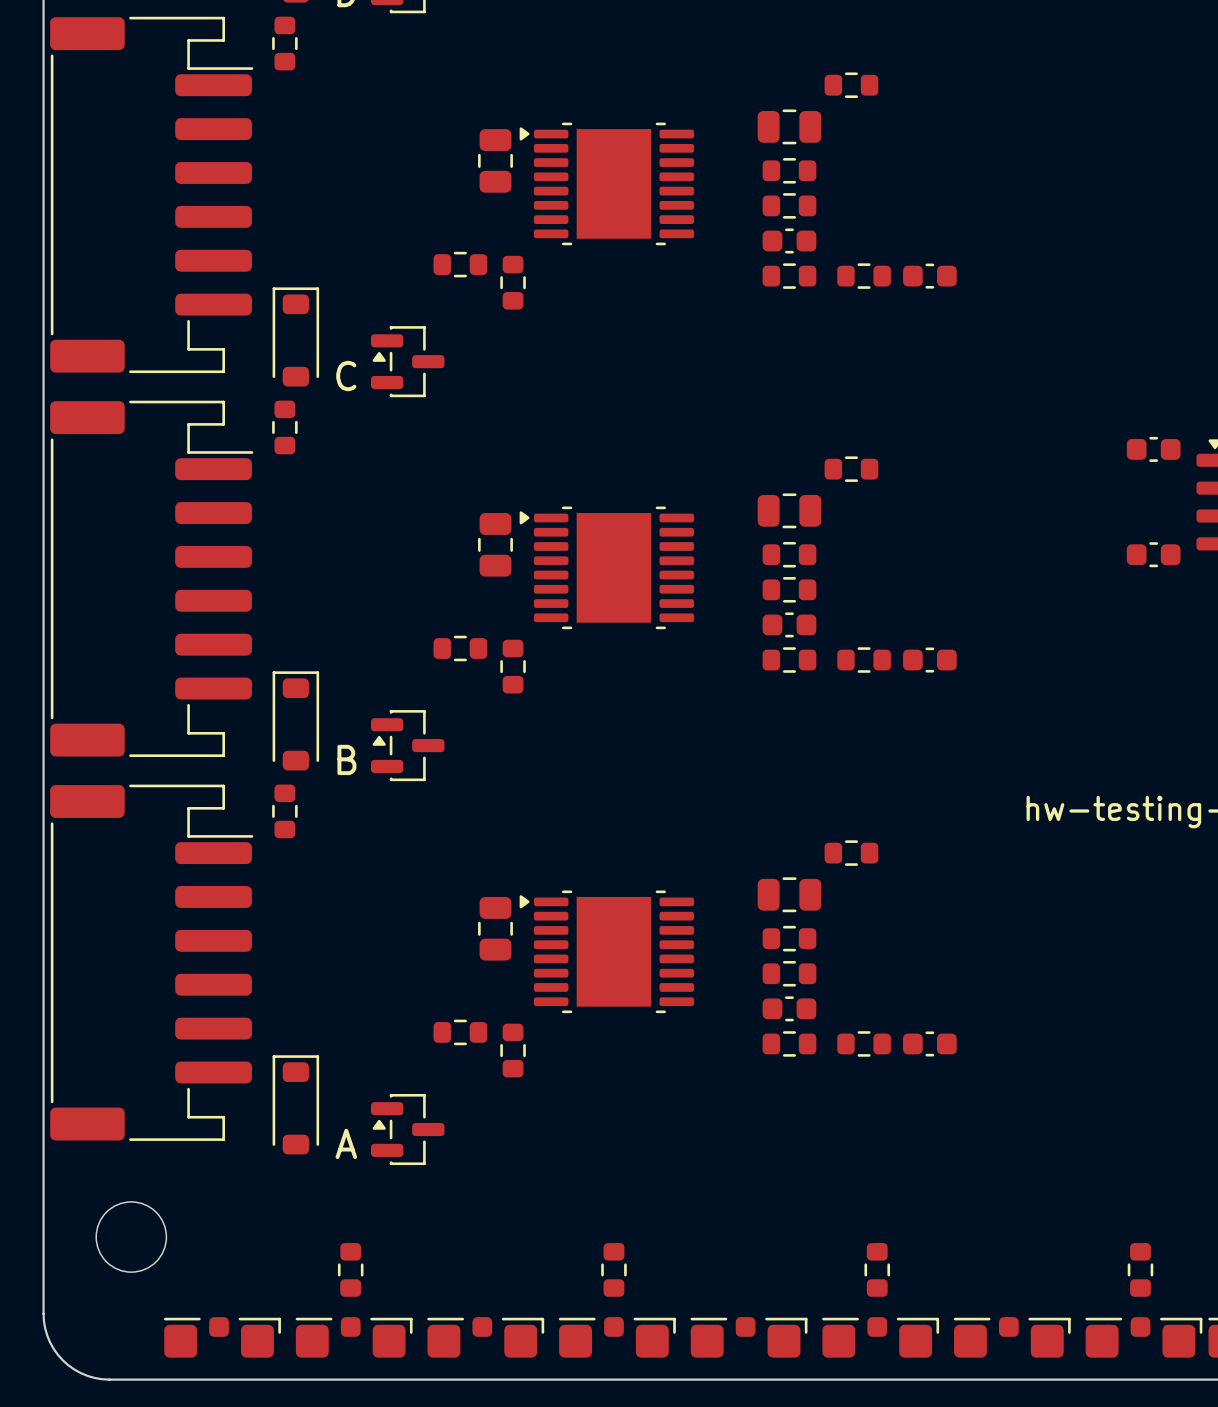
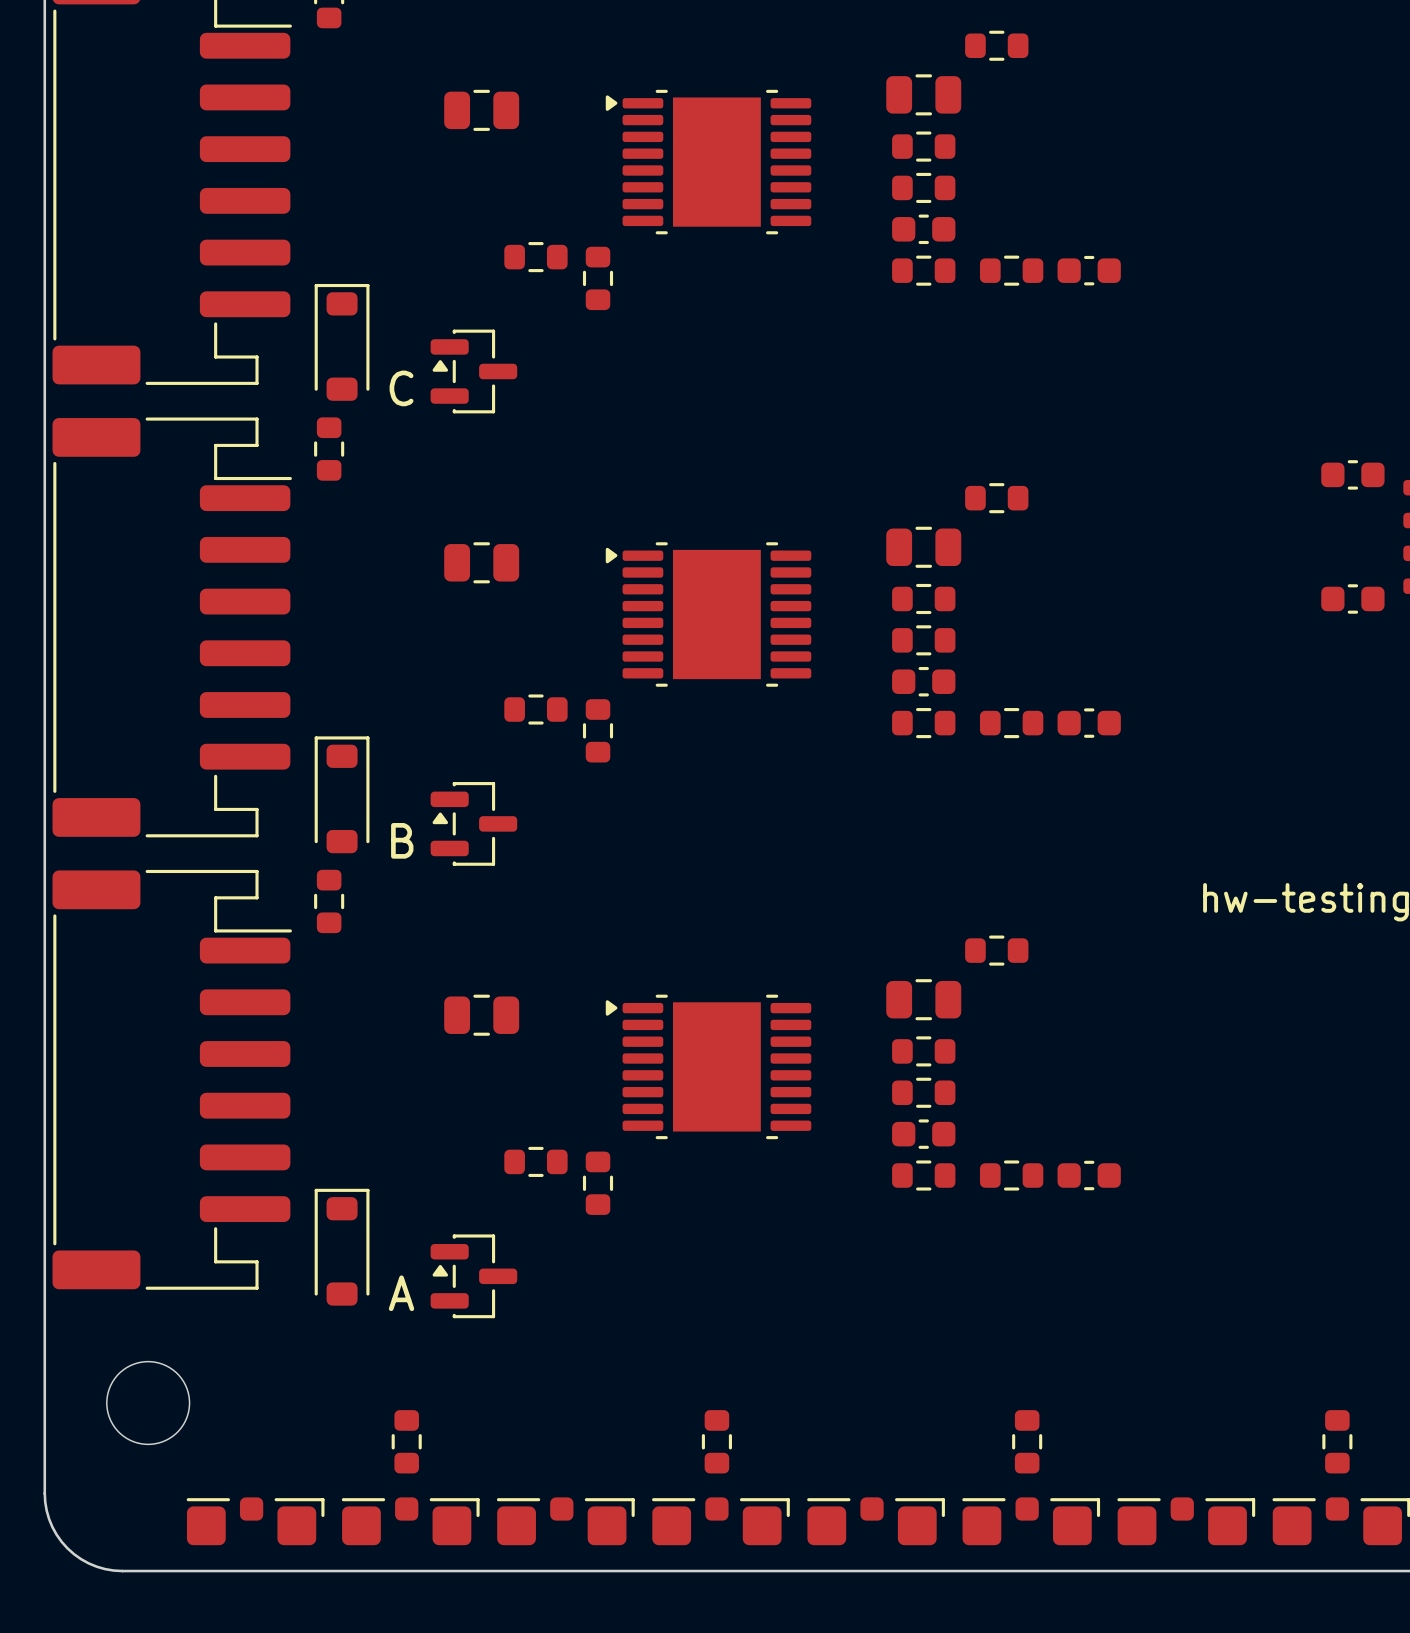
part rotation: 0° (495, 160) -> 90° clockwise (481, 110)
part position: (495, 160) -> (481, 110)
part rotation: 0° (495, 544) -> 90° clockwise (481, 562)
part position: (495, 544) -> (481, 562)
part rotation: 0° (495, 928) -> 90° clockwise (481, 1015)
part position: (495, 928) -> (481, 1015)

